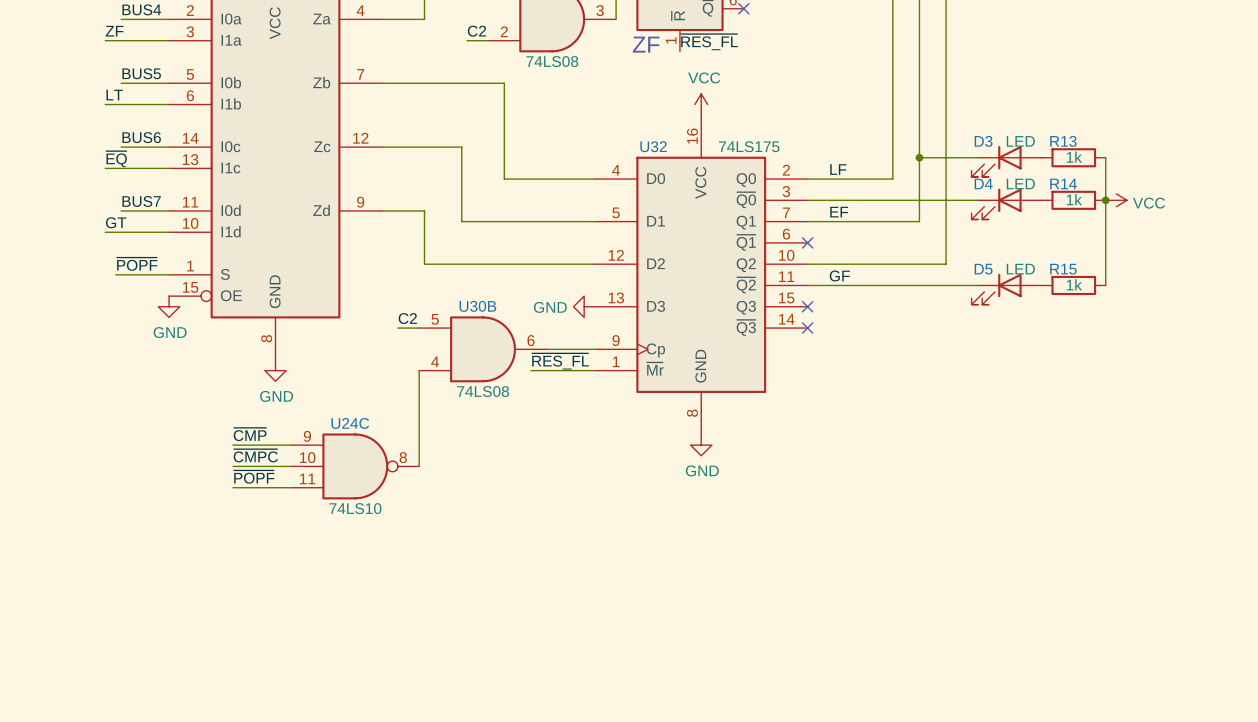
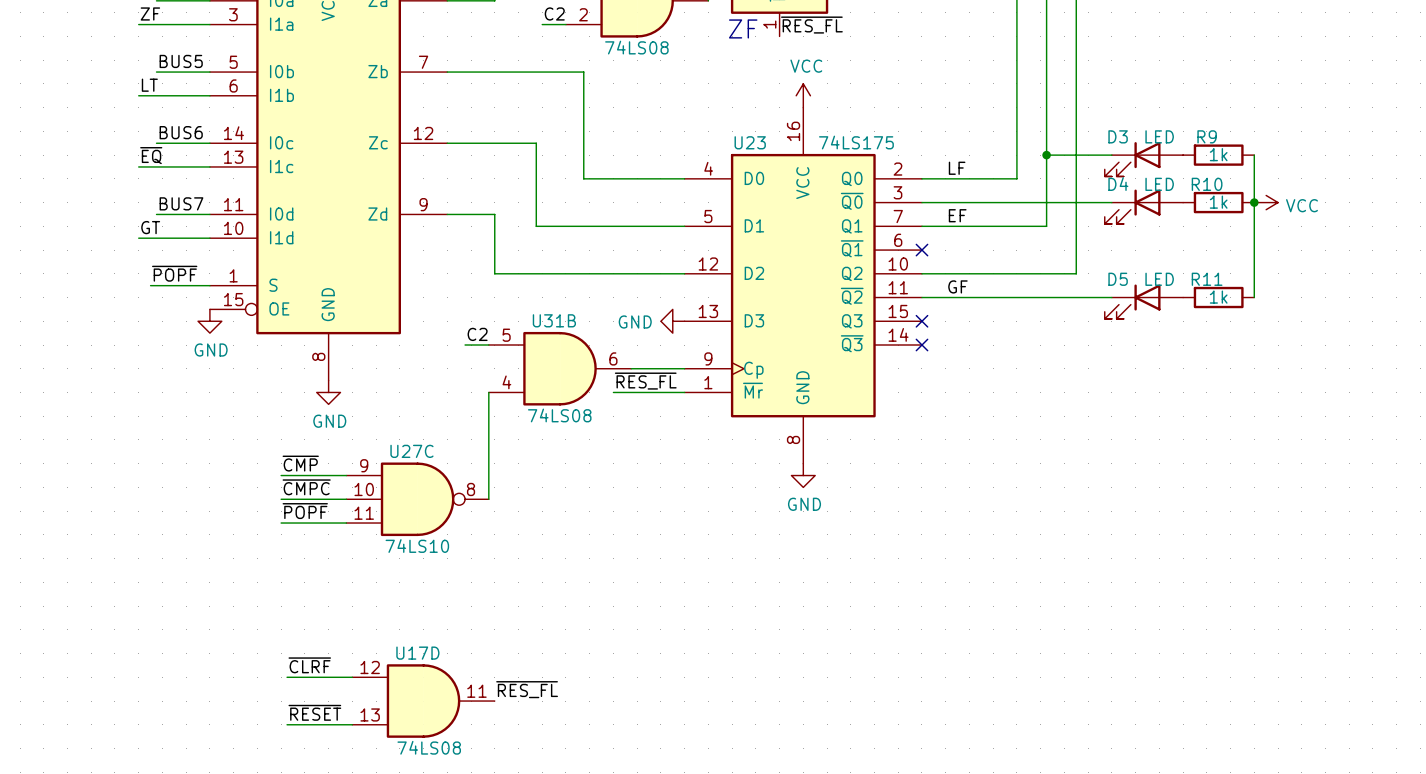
R13 name: R13 (1063, 141) -> R9 (1207, 136)
U32 name: U32 (653, 146) -> U23 (750, 142)
R14 name: R14 (1063, 183) -> R10 (1207, 184)
R15 name: R15 (1063, 269) -> R11 (1207, 279)
U30B name: U30B (477, 306) -> U31B (554, 320)
U24C name: U24C (350, 423) -> U27C (411, 451)
label: none -> ~{CLRF} (309, 665)
wire: none -> (287, 677) (352, 677)
label: none -> ~{RES_FL} (527, 689)
U17D: none -> 74LS08 (423, 701)
label: none -> ~{RESET} (314, 712)
wire: none -> (287, 724) (352, 724)

